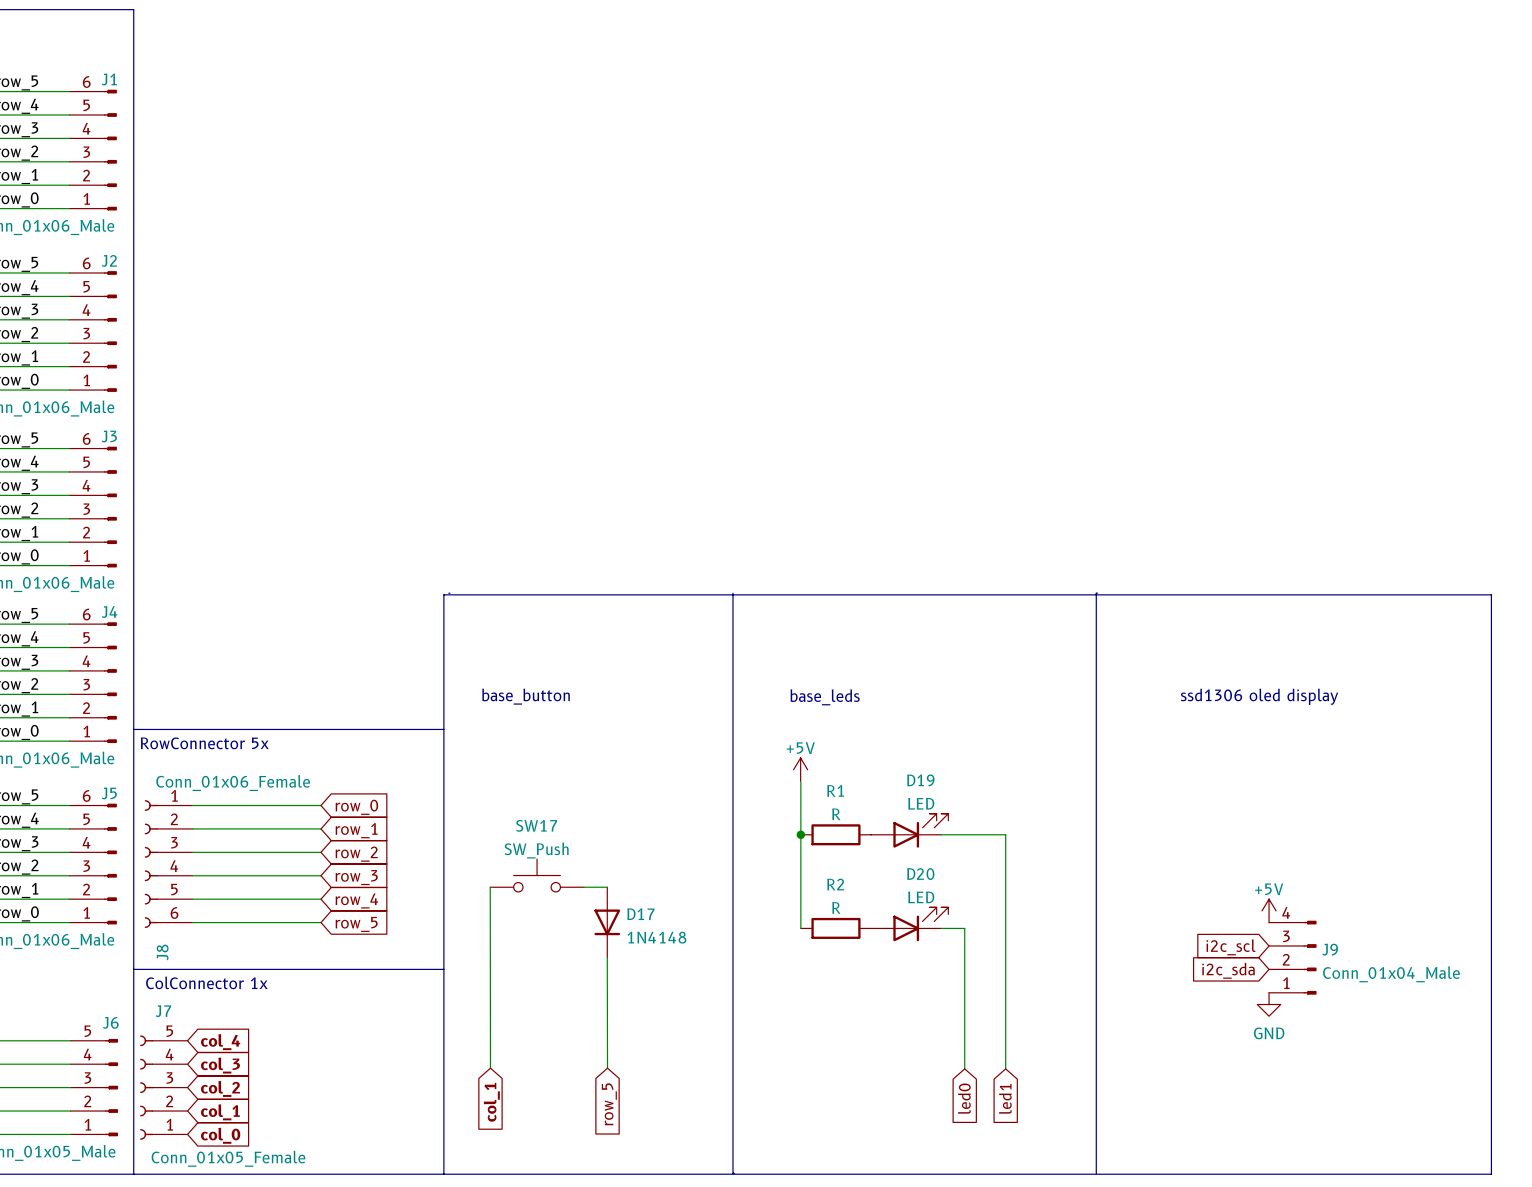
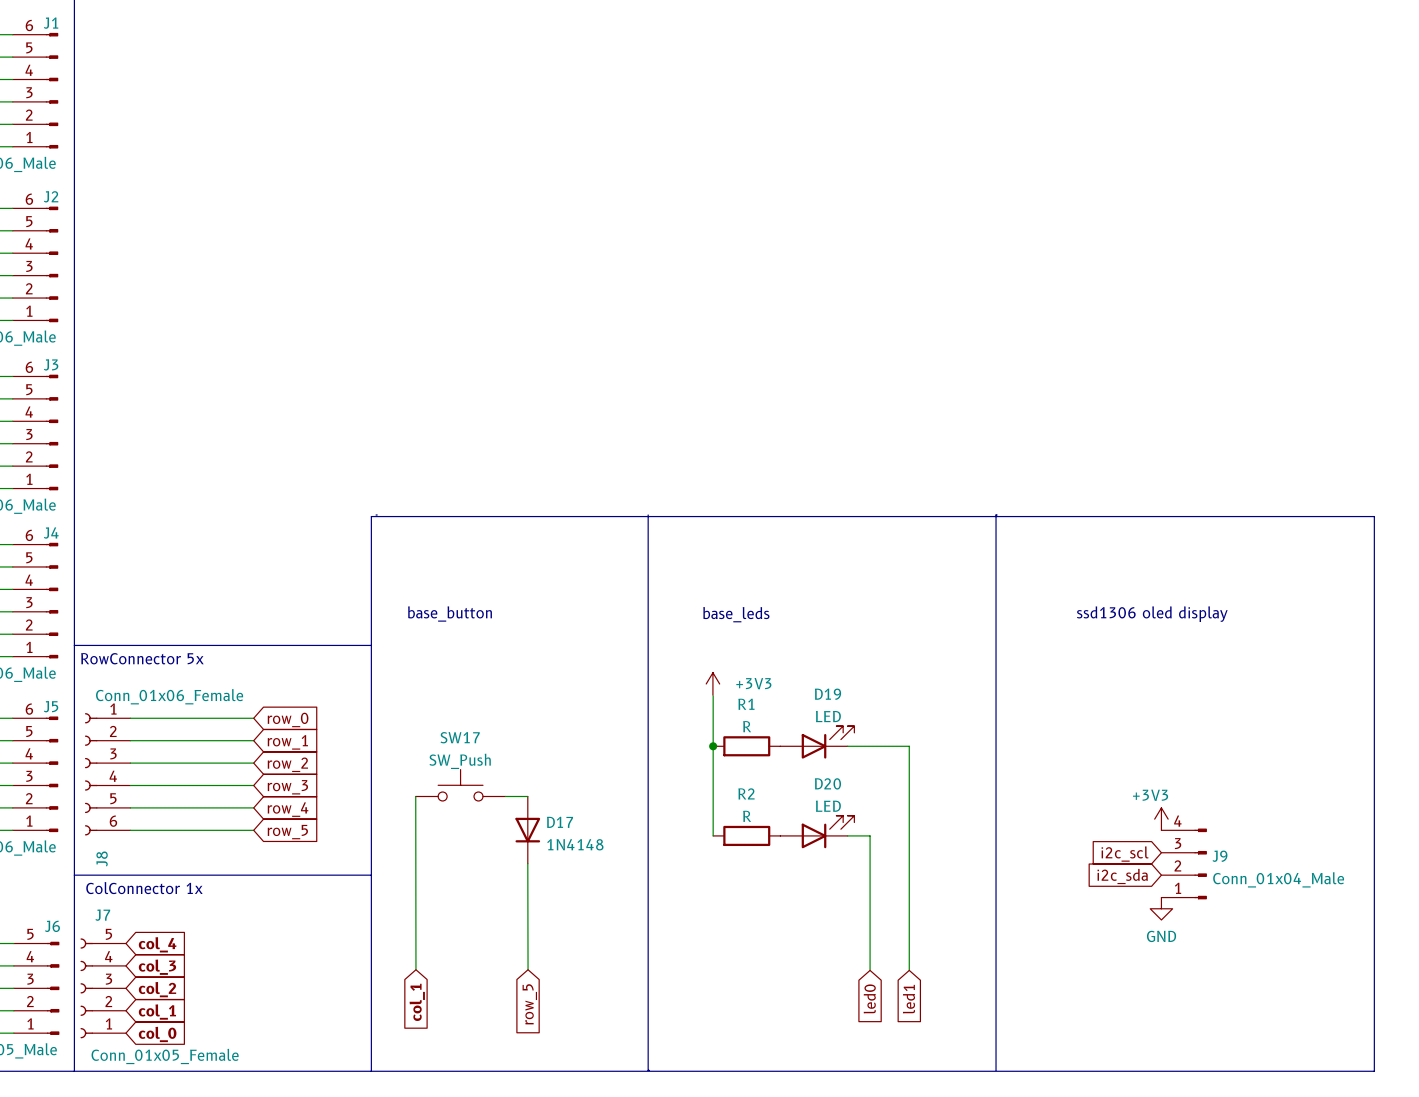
power symbol: +5V (800, 769) -> +3V3 (712, 683)
power symbol: +5V (1269, 910) -> +3V3 (1161, 819)

